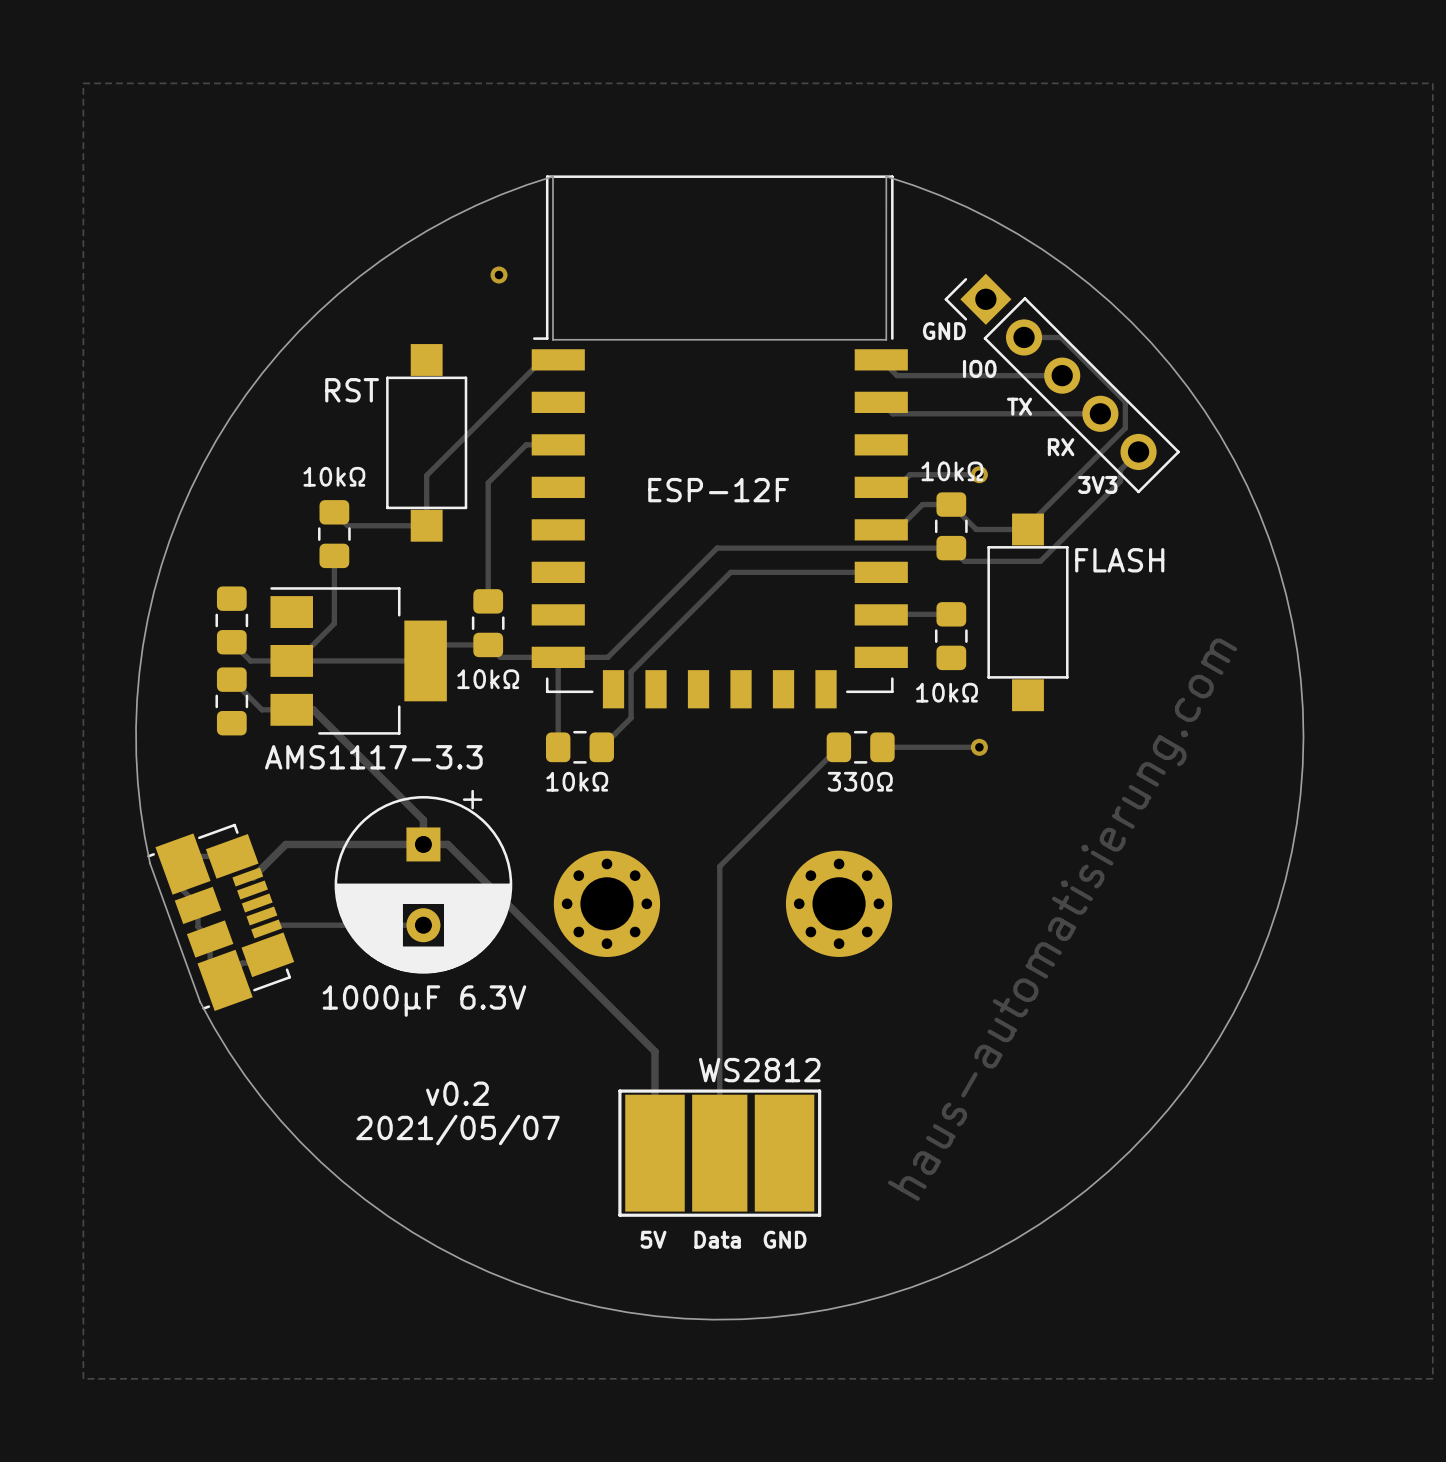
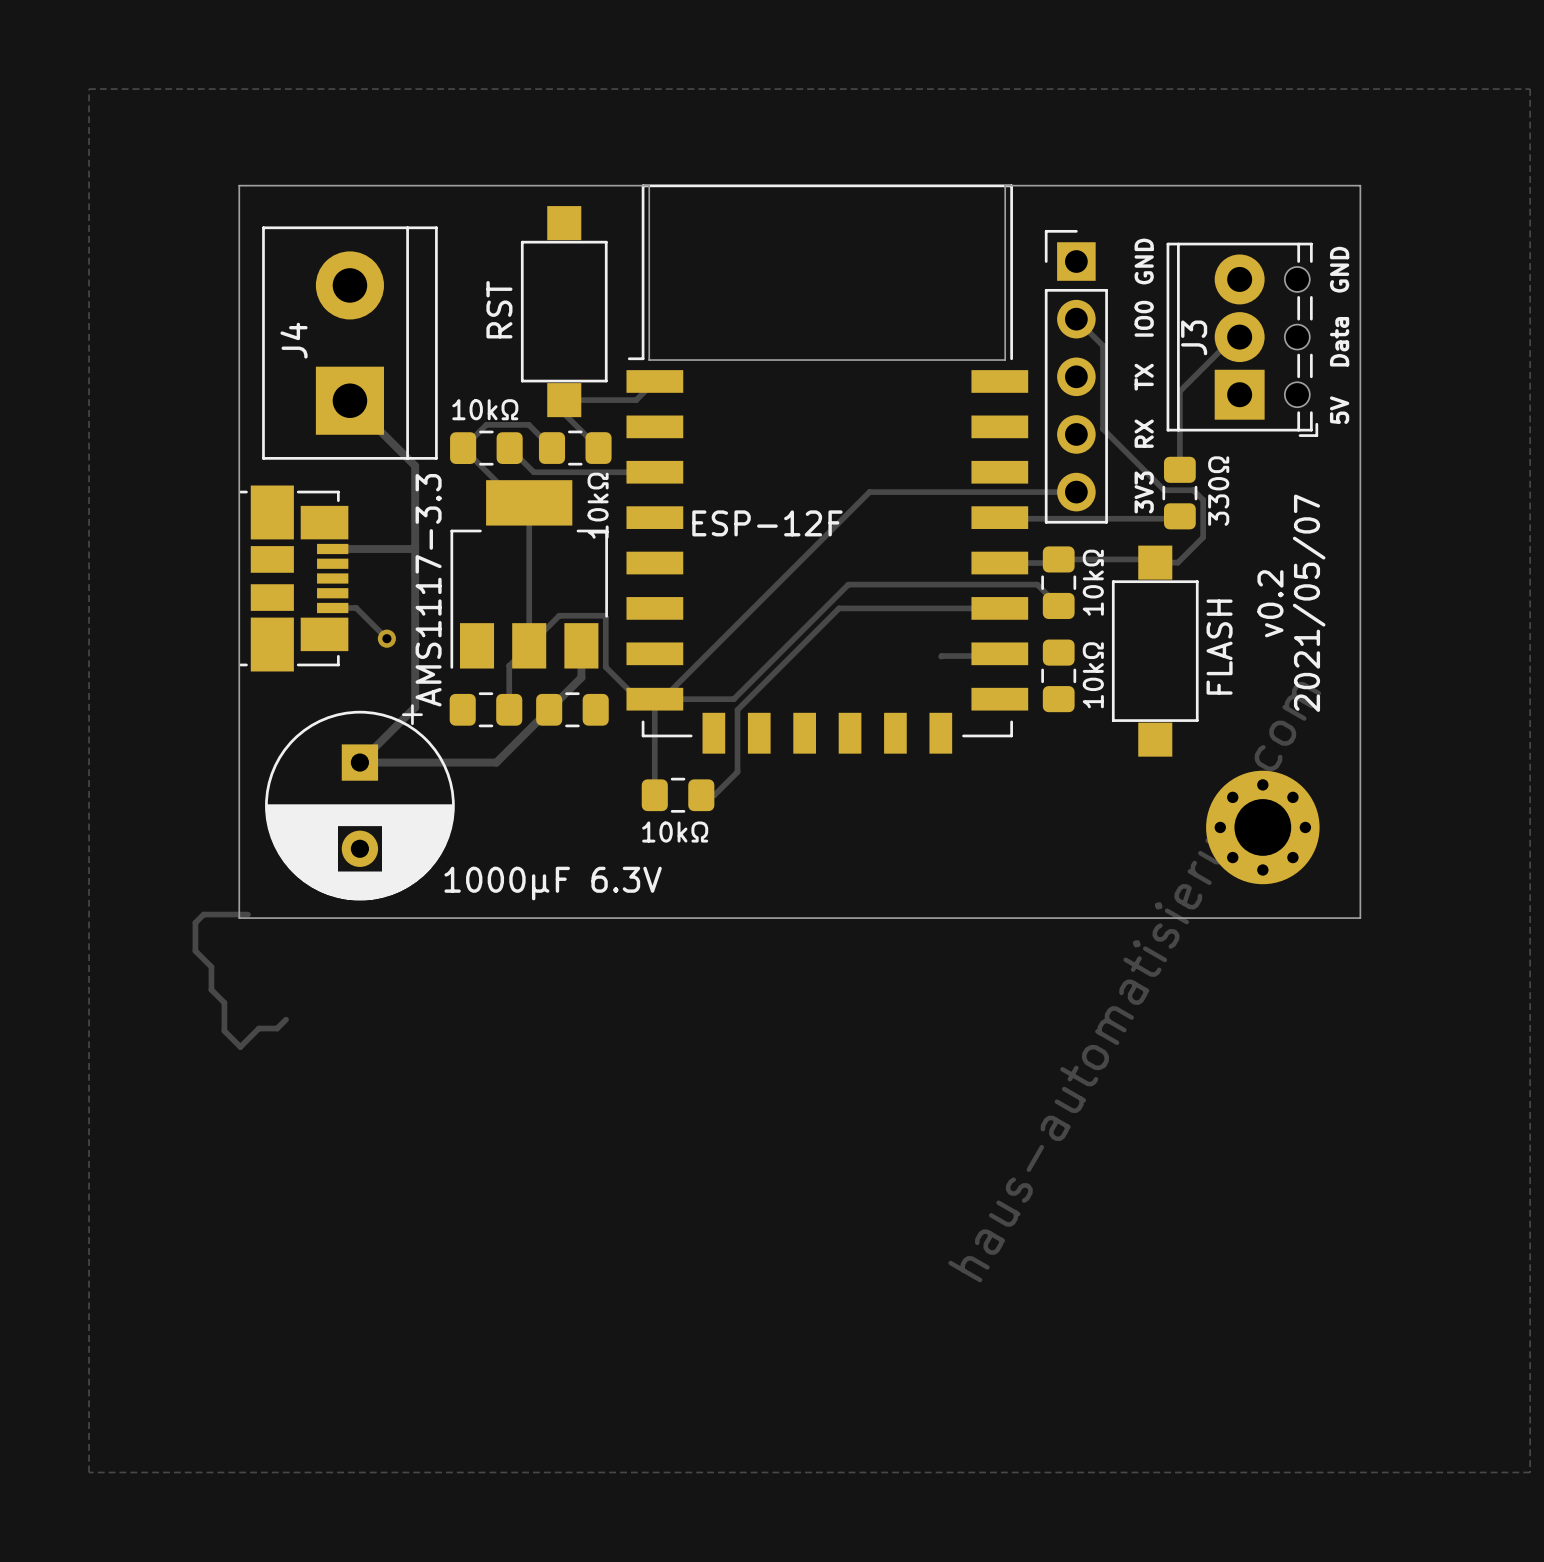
board edge: (552, 176) (552, 339) (886, 339) (886, 176) (940, 195) (992, 220) (1042, 249) (1088, 283) (1131, 322) (1170, 364) (1204, 411) (1234, 460) (1259, 512) (1278, 566) (1292, 622) (1300, 679) (1303, 737) (1300, 794) (1291, 851) (1277, 907) (1258, 961) (1233, 1013) (1203, 1063) (1168, 1109) (1129, 1151) (1086, 1189) (1040, 1223) (990, 1253) (938, 1277) (883, 1296) (827, 1309) (770, 1317) (684, 1318) (627, 1312) (570, 1300) (515, 1282) (462, 1260) (412, 1232) (364, 1199) (321, 1162) (280, 1120) (245, 1075) (200, 1001) (150, 863) (140, 809) (136, 755) (137, 700) (142, 645) (153, 592) (169, 539) (190, 489) (216, 440) (246, 394) (280, 351) (318, 312) (359, 276) (404, 244) (451, 217) (501, 194) (552, 176) -> (239, 185) (239, 918) (1360, 918) (1360, 185) (1005, 185) (1005, 360) (649, 360) (649, 185) (239, 185)
text: none -> GND (1339, 269)
via: (499, 275) -> none
track: none -> (1076, 319) (1103, 345) (1103, 429) (1164, 490) (1193, 490) (1203, 500) (1203, 537) (1177, 562) (1155, 562) (1152, 559) (1058, 559) (1055, 563) (999, 563)
track: none -> (1239, 331) (1179, 391) (1179, 469)
J3: none -> (1242, 339)
text: none -> Data (1339, 341)
J4: none -> (349, 343)
text rotation: 0° (944, 331) -> 90° counterclockwise (1144, 261)
text position: GND (944, 331) -> GND (1144, 261)
track: (1024, 337) (1061, 337) (1125, 401) (1125, 428) (1027, 525) (1027, 529) (976, 529) (951, 504) (922, 504) (897, 529) (881, 529) -> none
part: none -> (1076, 376)
track: none -> (654, 381) (636, 400) (564, 400) (564, 413) (598, 448)
track: (558, 359) (542, 359) (426, 475) (426, 525) (347, 525) (334, 512) -> none
track: (881, 359) (897, 375) (1062, 375) -> none
text rotation: 0° (979, 368) -> 90° counterclockwise (1144, 318)
text position: IO0 (979, 368) -> IO0 (1144, 318)
track: none -> (349, 400) (415, 465) (415, 707) (359, 762) (496, 762) (581, 677) (581, 645)
text: none -> 10kΩ (485, 409)
part: (1062, 383) -> none
text: none -> 5V (1339, 410)
text rotation: 0° (352, 390) -> 90° counterclockwise (499, 309)
text position: RST (352, 390) -> RST (499, 309)
track: (881, 402) (892, 413) (1100, 413) -> none
text rotation: 0° (1019, 406) -> 90° counterclockwise (1144, 377)
text position: TX (1019, 406) -> TX (1144, 377)
part: none -> (486, 448)
track: none -> (509, 448) (533, 472) (654, 472)
track: none -> (552, 448) (528, 424) (486, 424) (463, 448) (517, 502) (529, 502) (529, 645)
part: none -> (575, 448)
part position: (719, 441) -> (827, 469)
part position: (426, 442) -> (564, 311)
track: (558, 444) (526, 444) (488, 482) (488, 601) -> none
text rotation: 0° (1061, 447) -> 90° counterclockwise (1144, 433)
text position: RX (1061, 447) -> RX (1144, 433)
track: (1138, 451) (1120, 470) (1120, 481) (1040, 561) (964, 561) (951, 548) (717, 548) (607, 657) (500, 657) (488, 644) (441, 644) (425, 660) (250, 660) (231, 642) -> none
track: none -> (1076, 492) (869, 492) (662, 699)
part: none -> (1179, 493)
text: 10kΩ (952, 471) -> none
text: none -> 10kΩ (598, 505)
track: (979, 474) (909, 474) (897, 487) (881, 487) -> none
via: (979, 474) -> none
text: 10kΩ (334, 476) -> none
track: none -> (1179, 516) (1177, 518) (999, 517)
text rotation: 0° (1097, 484) -> 90° counterclockwise (1144, 492)
track: none -> (415, 546) (412, 548) (332, 548)
part position: (951, 526) -> (1058, 582)
part: (334, 534) -> none
part: none -> (293, 578)
text: none -> 10kΩ (1093, 582)
track: (334, 555) (334, 623) (297, 660) -> none
text rotation: 0° (1119, 560) -> 90° counterclockwise (1219, 647)
text: none -> 2021/05/07 (1309, 603)
text: none -> v0.2 (1270, 603)
track: none -> (1058, 605) (1037, 584) (848, 584) (733, 699) (637, 699) (605, 667) (605, 617) (559, 615) (509, 665) (509, 709)
track: none -> (332, 608) (356, 608) (386, 638)
track: none -> (999, 608) (839, 608) (737, 709) (737, 772) (714, 795) (701, 795)
track: (881, 572) (730, 572) (631, 672) (631, 718) (601, 747) -> none
via: none -> (386, 638)
part position: (1027, 612) -> (1155, 651)
part: (231, 620) -> none
part: (488, 623) -> none
text: none -> 10kΩ (1093, 675)
part position: (951, 636) -> (1058, 675)
track: (558, 657) (558, 747) -> (654, 699) (654, 795)
part rotation: 0° (358, 660) -> 90° counterclockwise (529, 574)
part position: (358, 660) -> (529, 574)
part: none -> (485, 709)
part: none -> (572, 709)
track: (231, 679) (262, 709) (291, 709) -> none
text: 10kΩ (488, 679) -> none
text: 10kΩ (947, 692) -> none
part: (231, 701) -> none
track: (291, 709) (313, 709) (423, 820) (423, 844) -> none
part: none -> (678, 795)
part: (579, 747) -> none
track: (838, 747) (719, 866) (719, 1153) -> none
part: (860, 747) -> none
track: (882, 747) (979, 747) -> none
via: (979, 747) -> none
text rotation: 0° (373, 757) -> 90° counterclockwise (428, 590)
part: none -> (1262, 827)
text position: 10kΩ (577, 781) -> 10kΩ (675, 832)
text rotation: 0° (860, 781) -> 90° counterclockwise (1218, 491)
text position: 330Ω (860, 781) -> 330Ω (1218, 491)
track: (247, 877) (253, 877) (285, 844) (447, 844) (655, 1051) (655, 1153) -> none
part position: (423, 881) -> (359, 802)
part: (606, 903) -> none
part: (839, 903) -> none
part: (220, 917) -> none
track: (423, 925) (277, 925) -> none
text position: 1000µF 6.3V (424, 1001) -> 1000µF 6.3V (553, 883)
text: WS2812 (759, 1070) -> none
text: v0.2 (457, 1093) -> none
text: 2021/05/07 (457, 1129) -> none
part: (719, 1153) -> none
text: 5V (653, 1239) -> none
text: Data (717, 1239) -> none
text: GND (785, 1239) -> none

